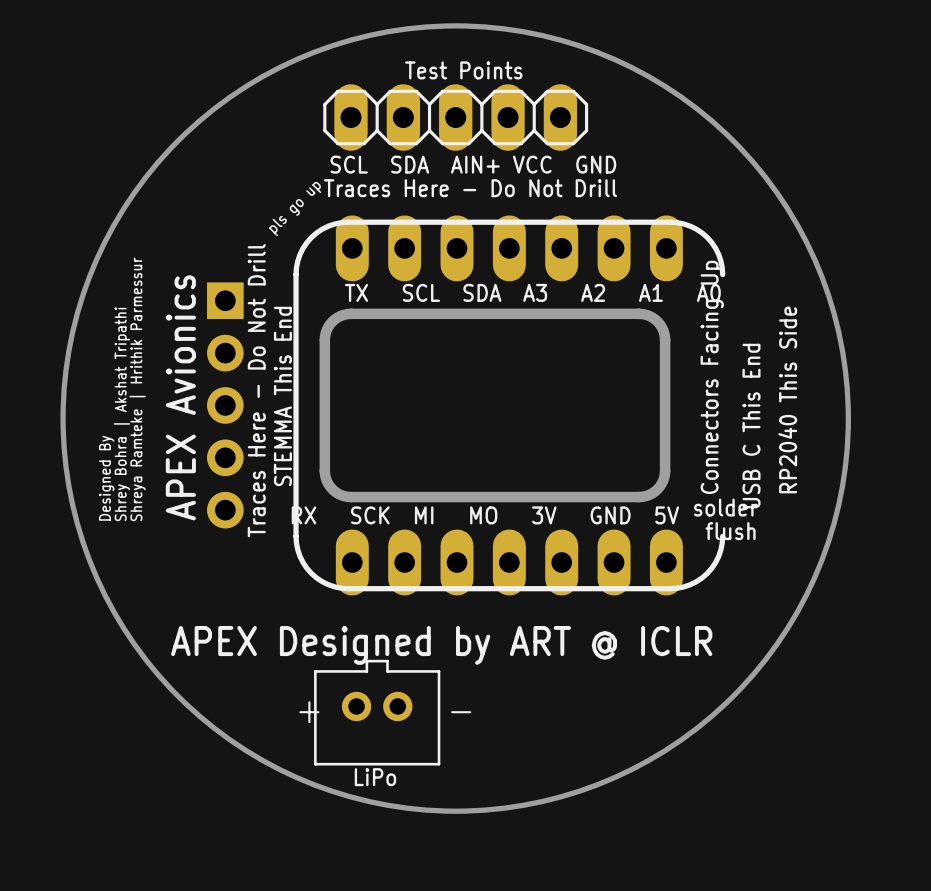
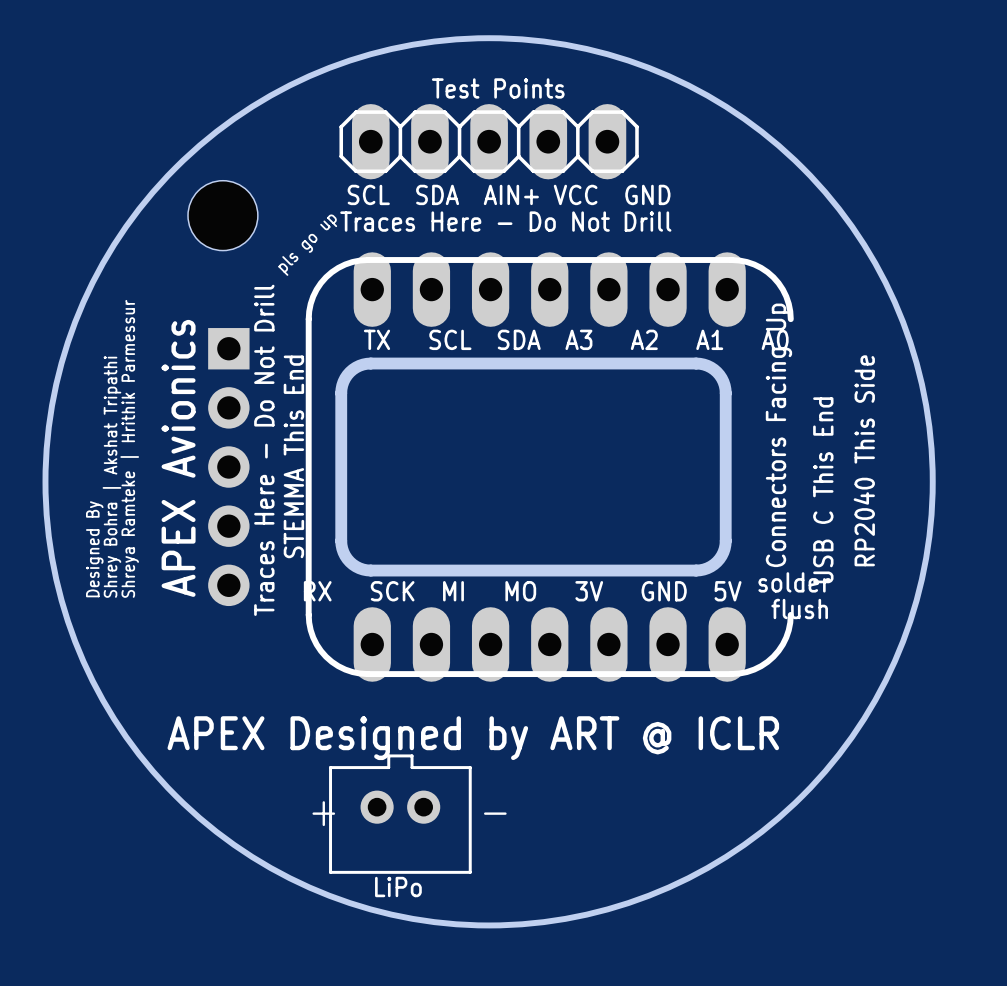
hole: none -> (222, 215)

